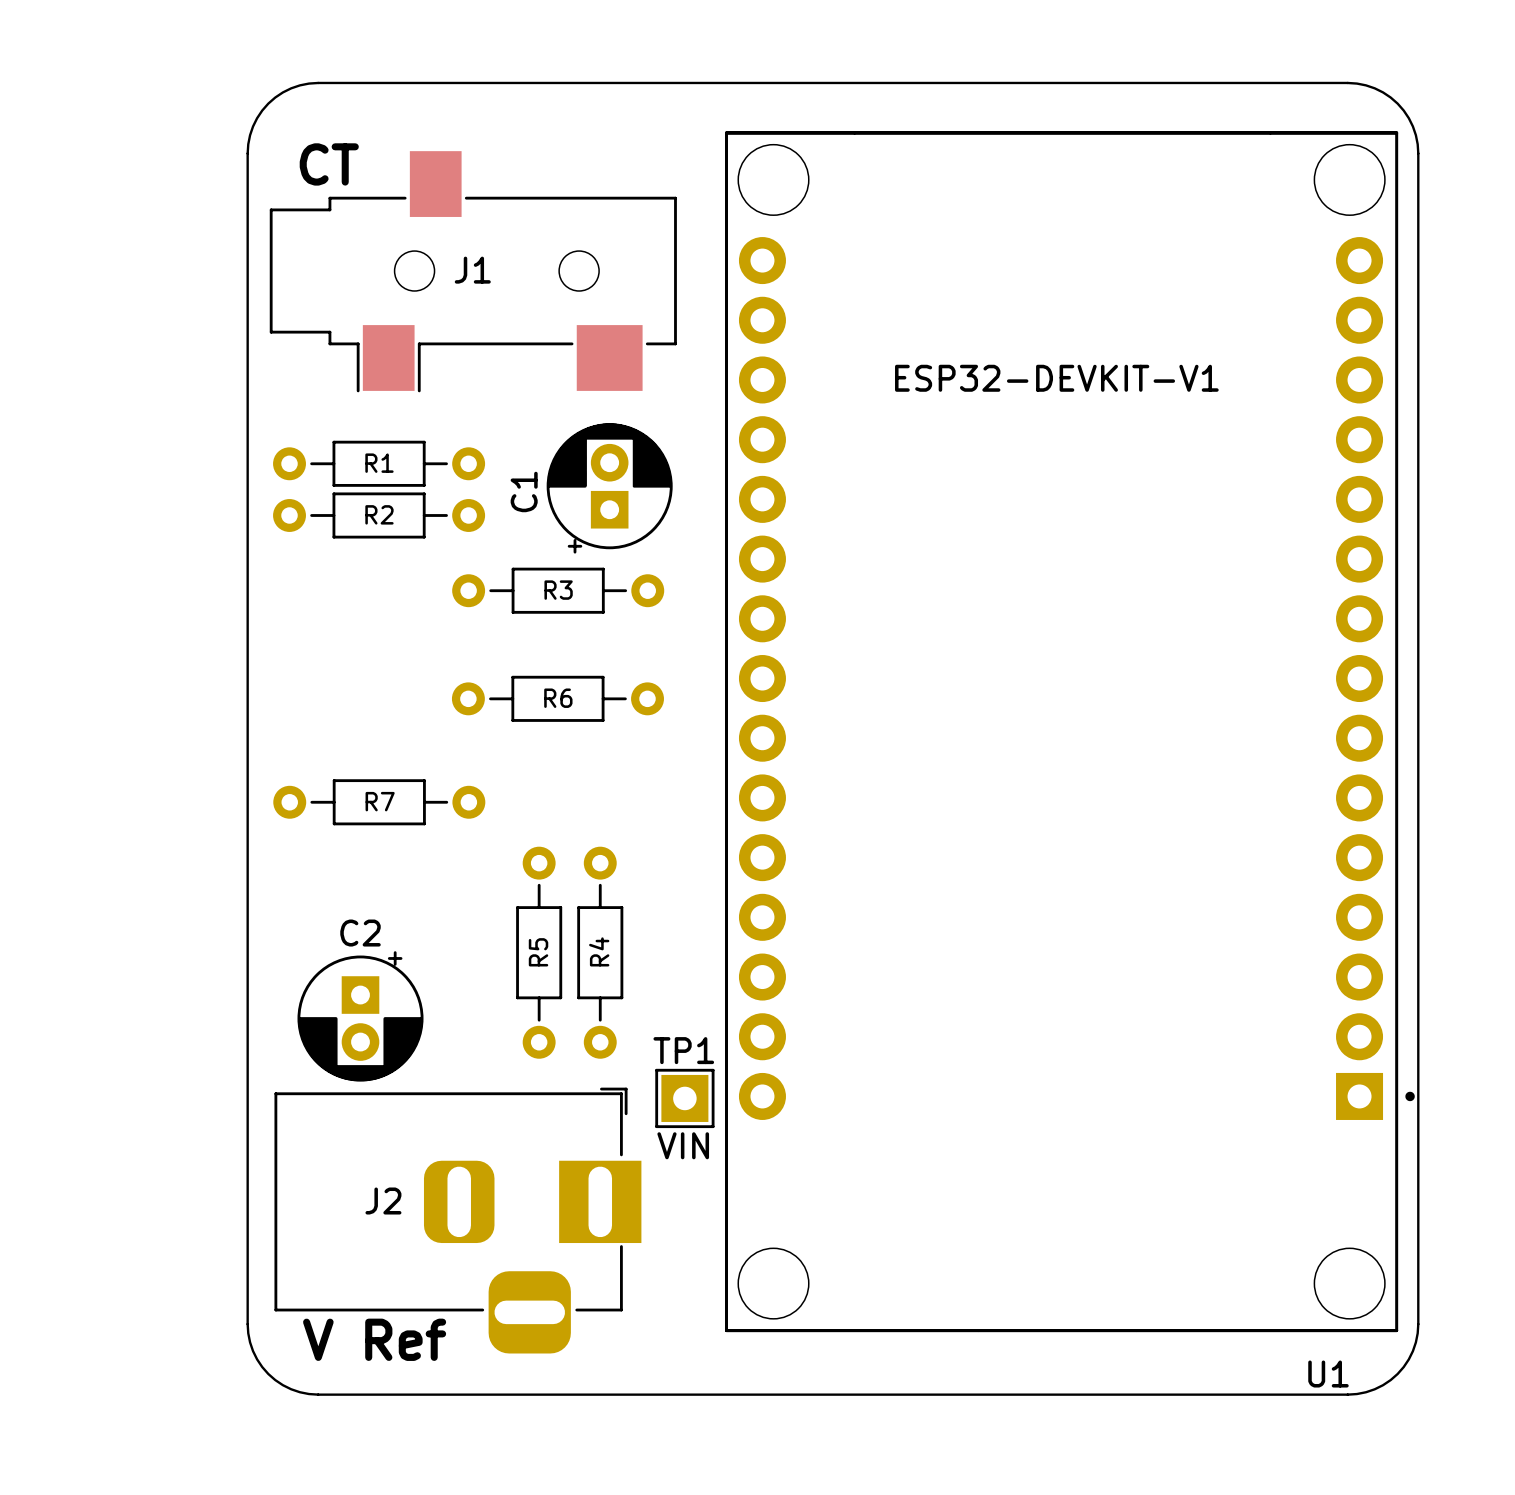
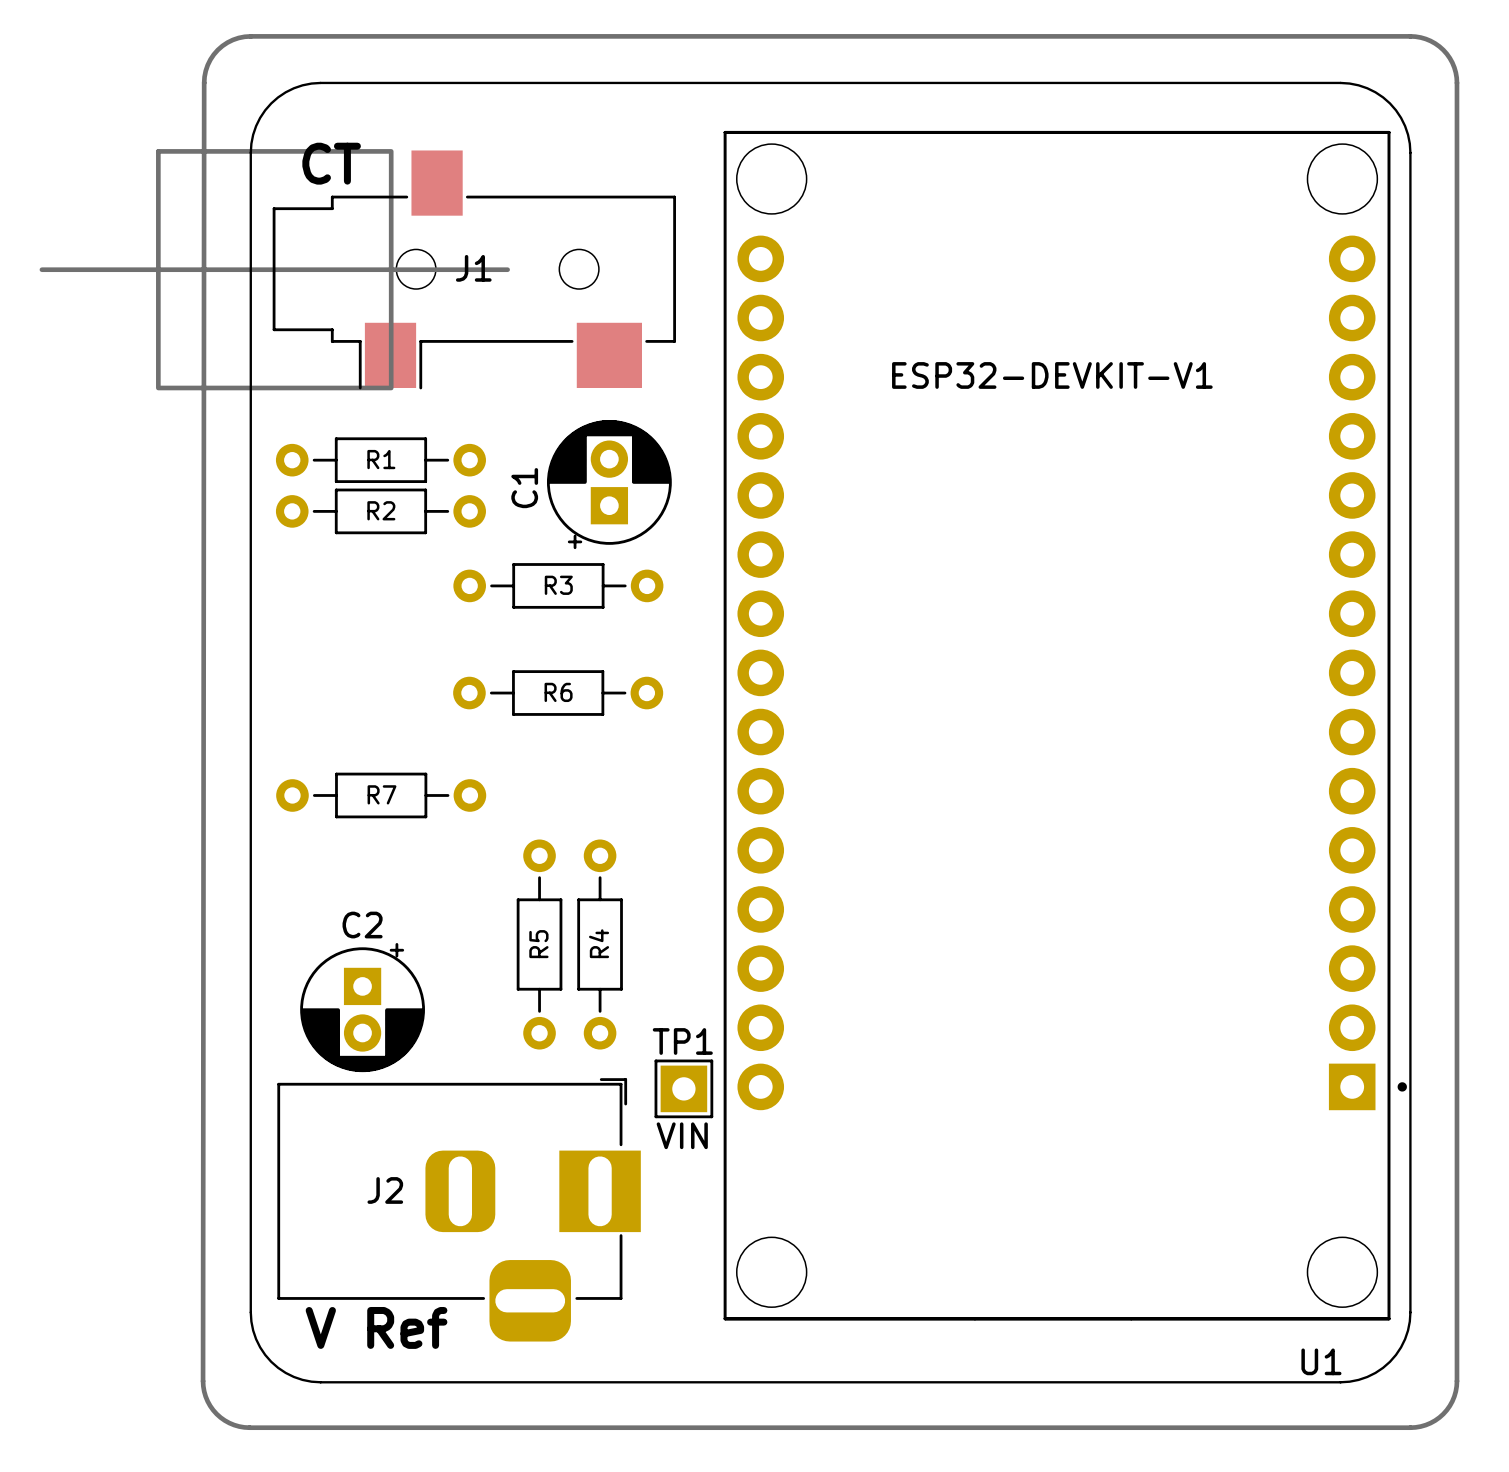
line: none -> (250, 36) (1410, 36) (1430, 40) (1446, 53) (1454, 67) (1456, 82) (1456, 1381) (1452, 1401) (1439, 1417) (1425, 1425) (1410, 1427) (249, 1427) (229, 1423) (213, 1410) (205, 1396) (203, 1381) (204, 82) (207, 65) (217, 50) (232, 39) (250, 36)
drawing: none -> [39, 149, 510, 391]

